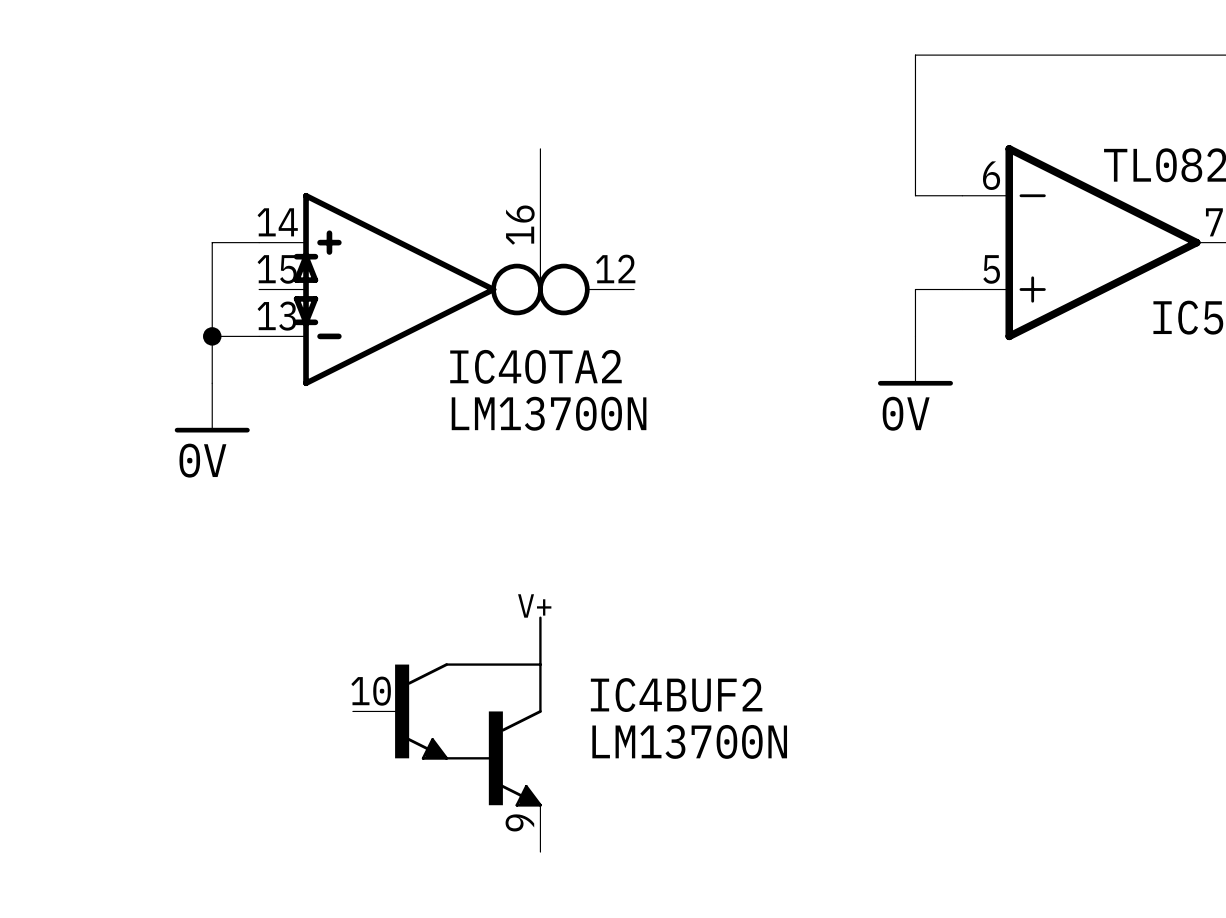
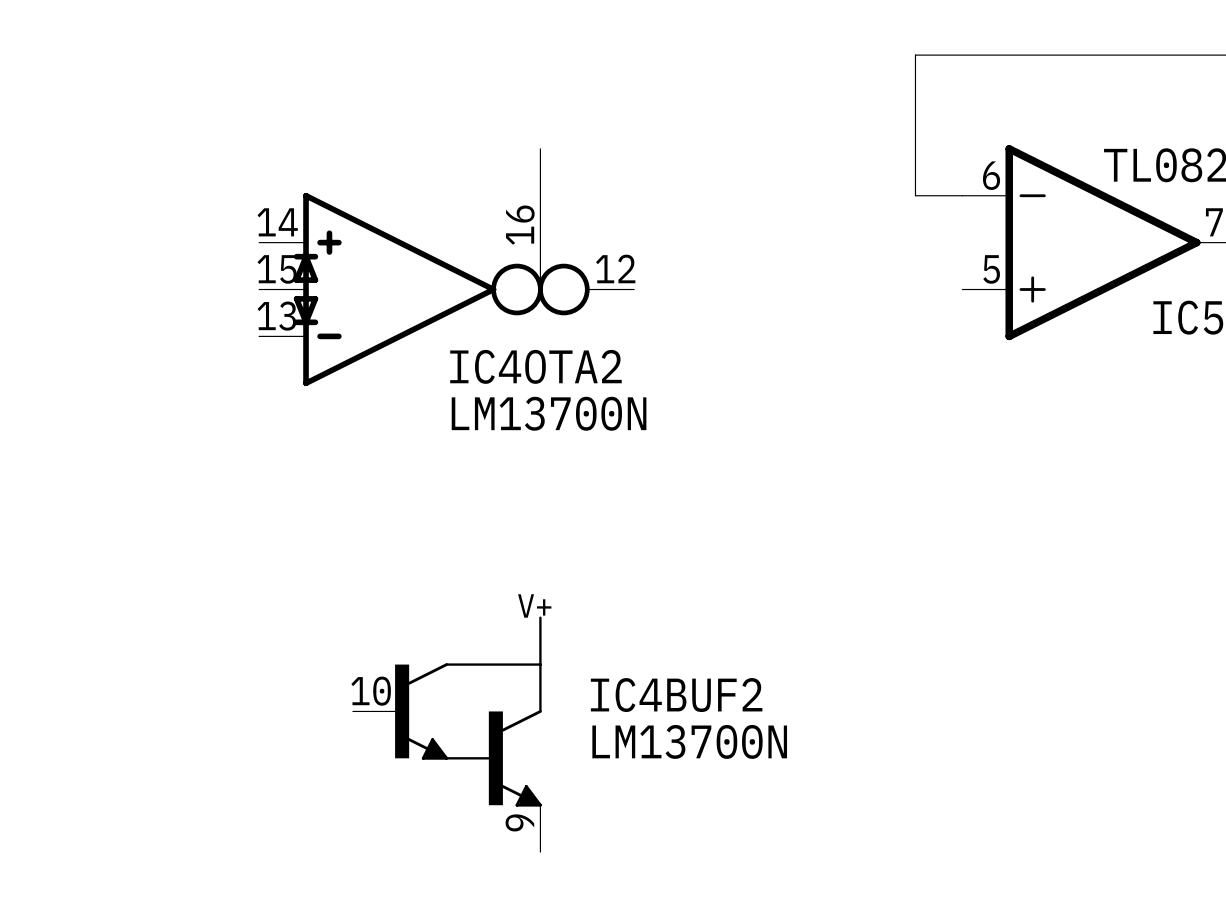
wire: (259, 242) (212, 242) (212, 383) -> none
wire: (962, 289) (915, 289) (915, 336) -> none
wire: (212, 336) (259, 336) -> none
junction: (212, 336) -> none
power symbol: 0V (915, 361) -> none
power symbol: 0V (212, 407) -> none

